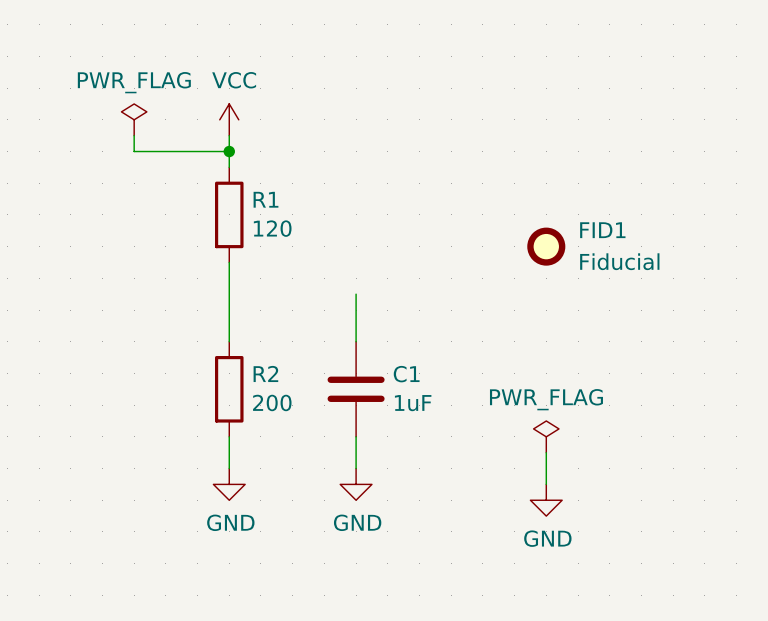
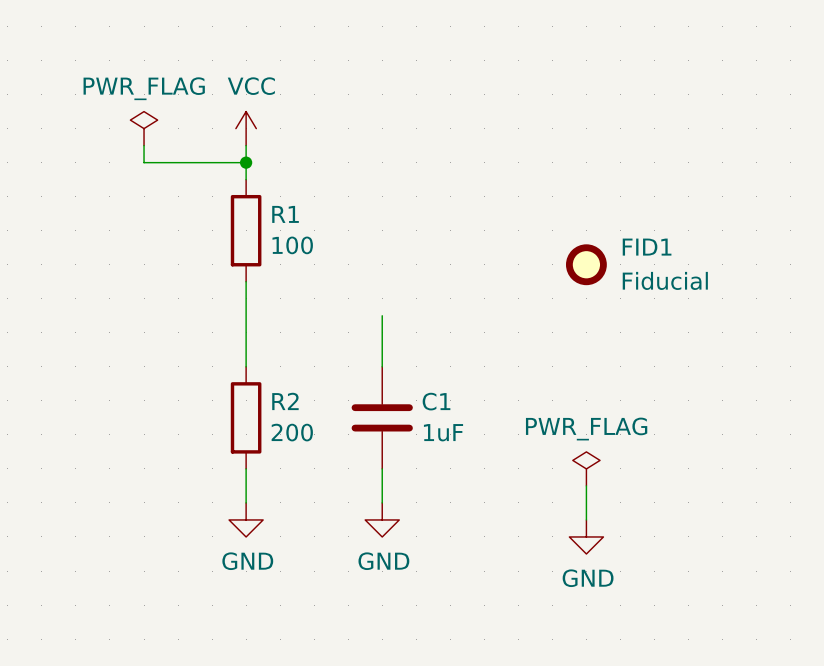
R1 value: 120 (272, 228) -> 100 (292, 245)

